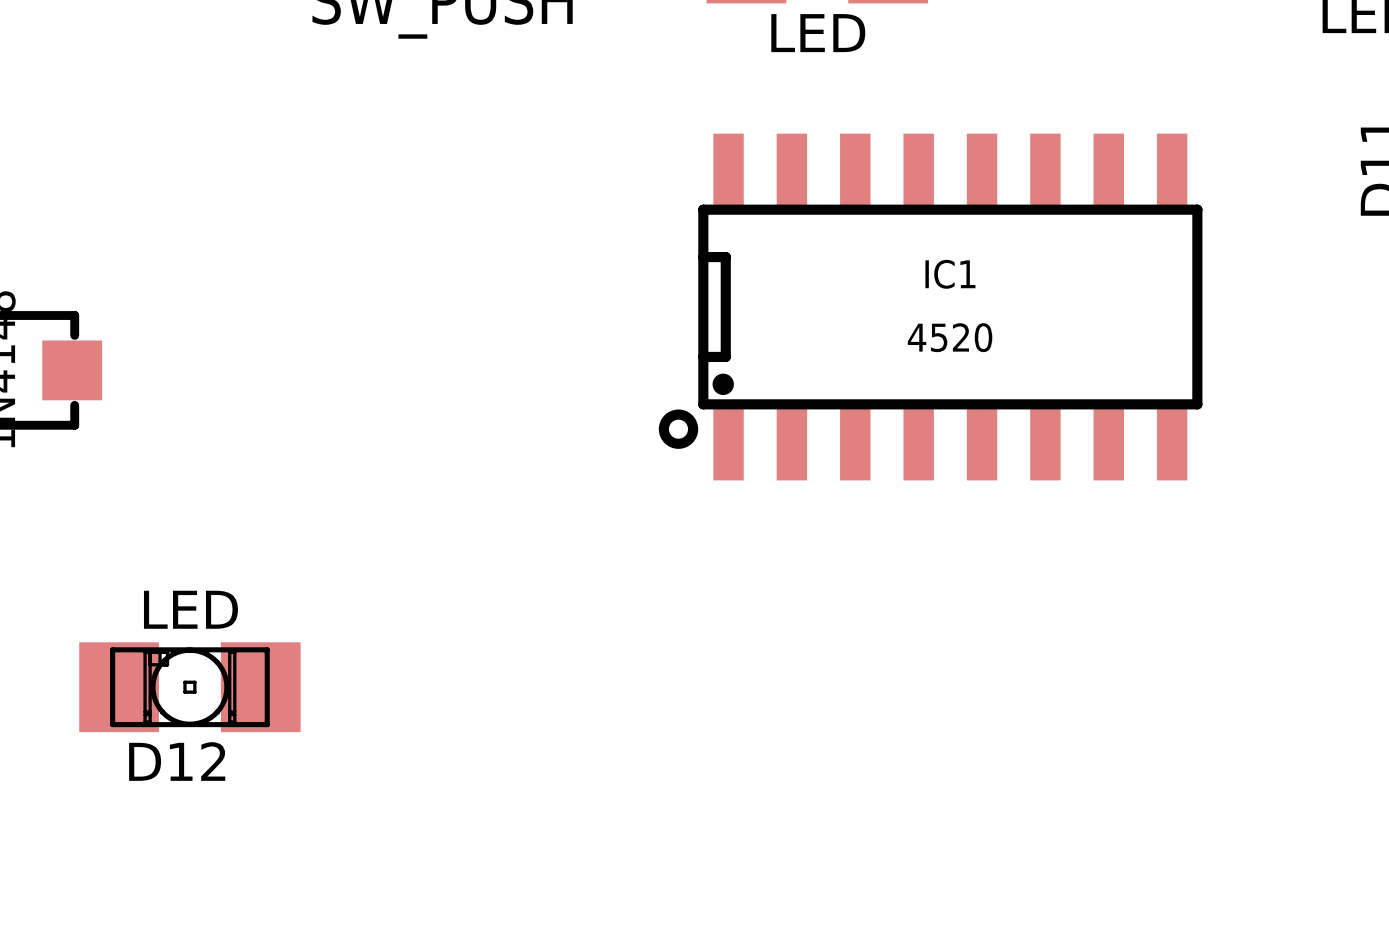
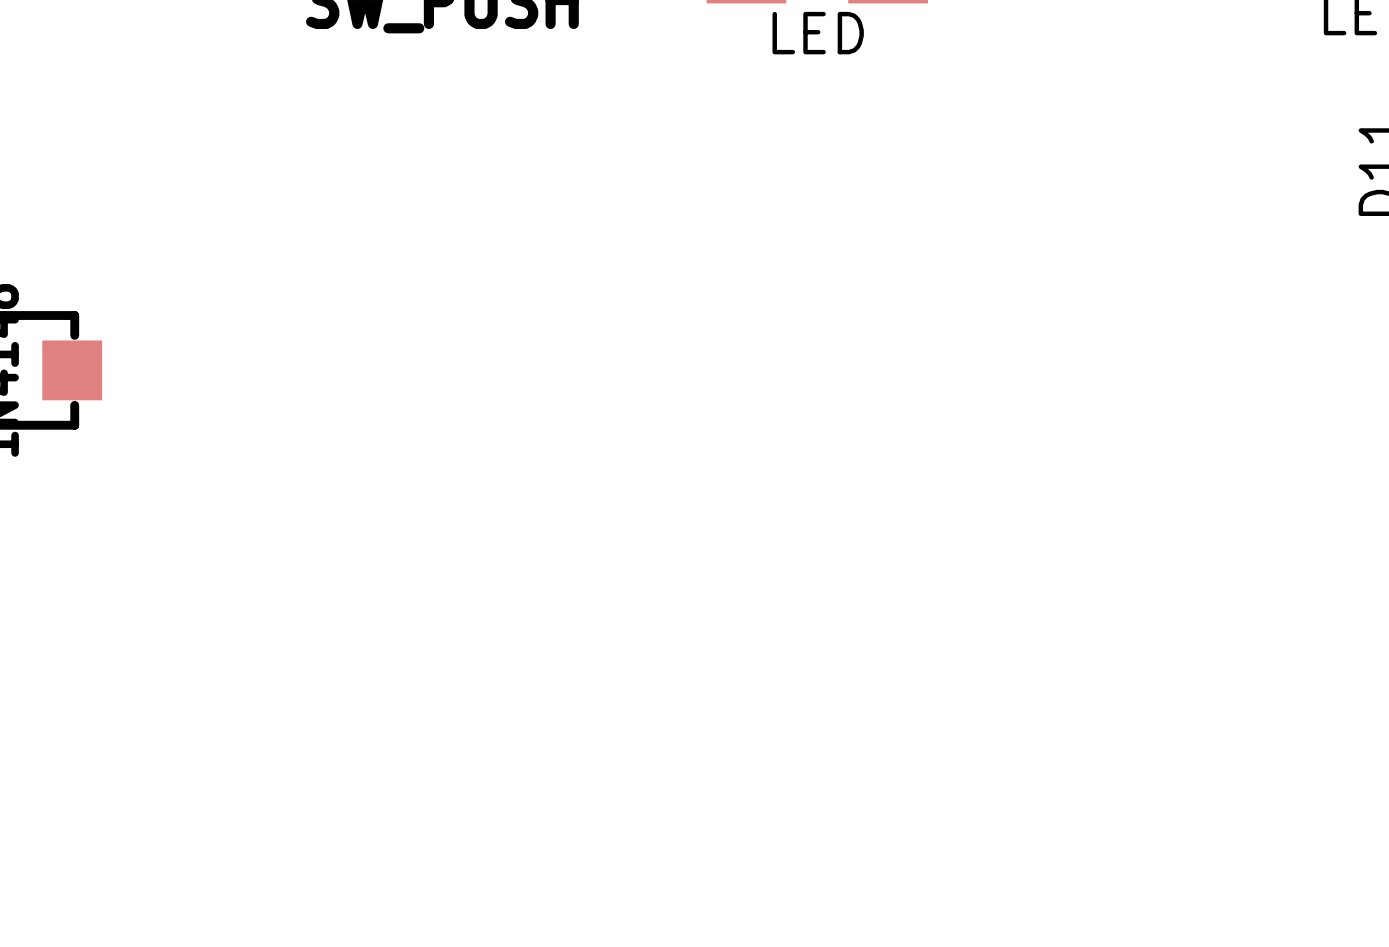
IC1: 4520 (930, 307) -> none
D12: LED (189, 687) -> none

